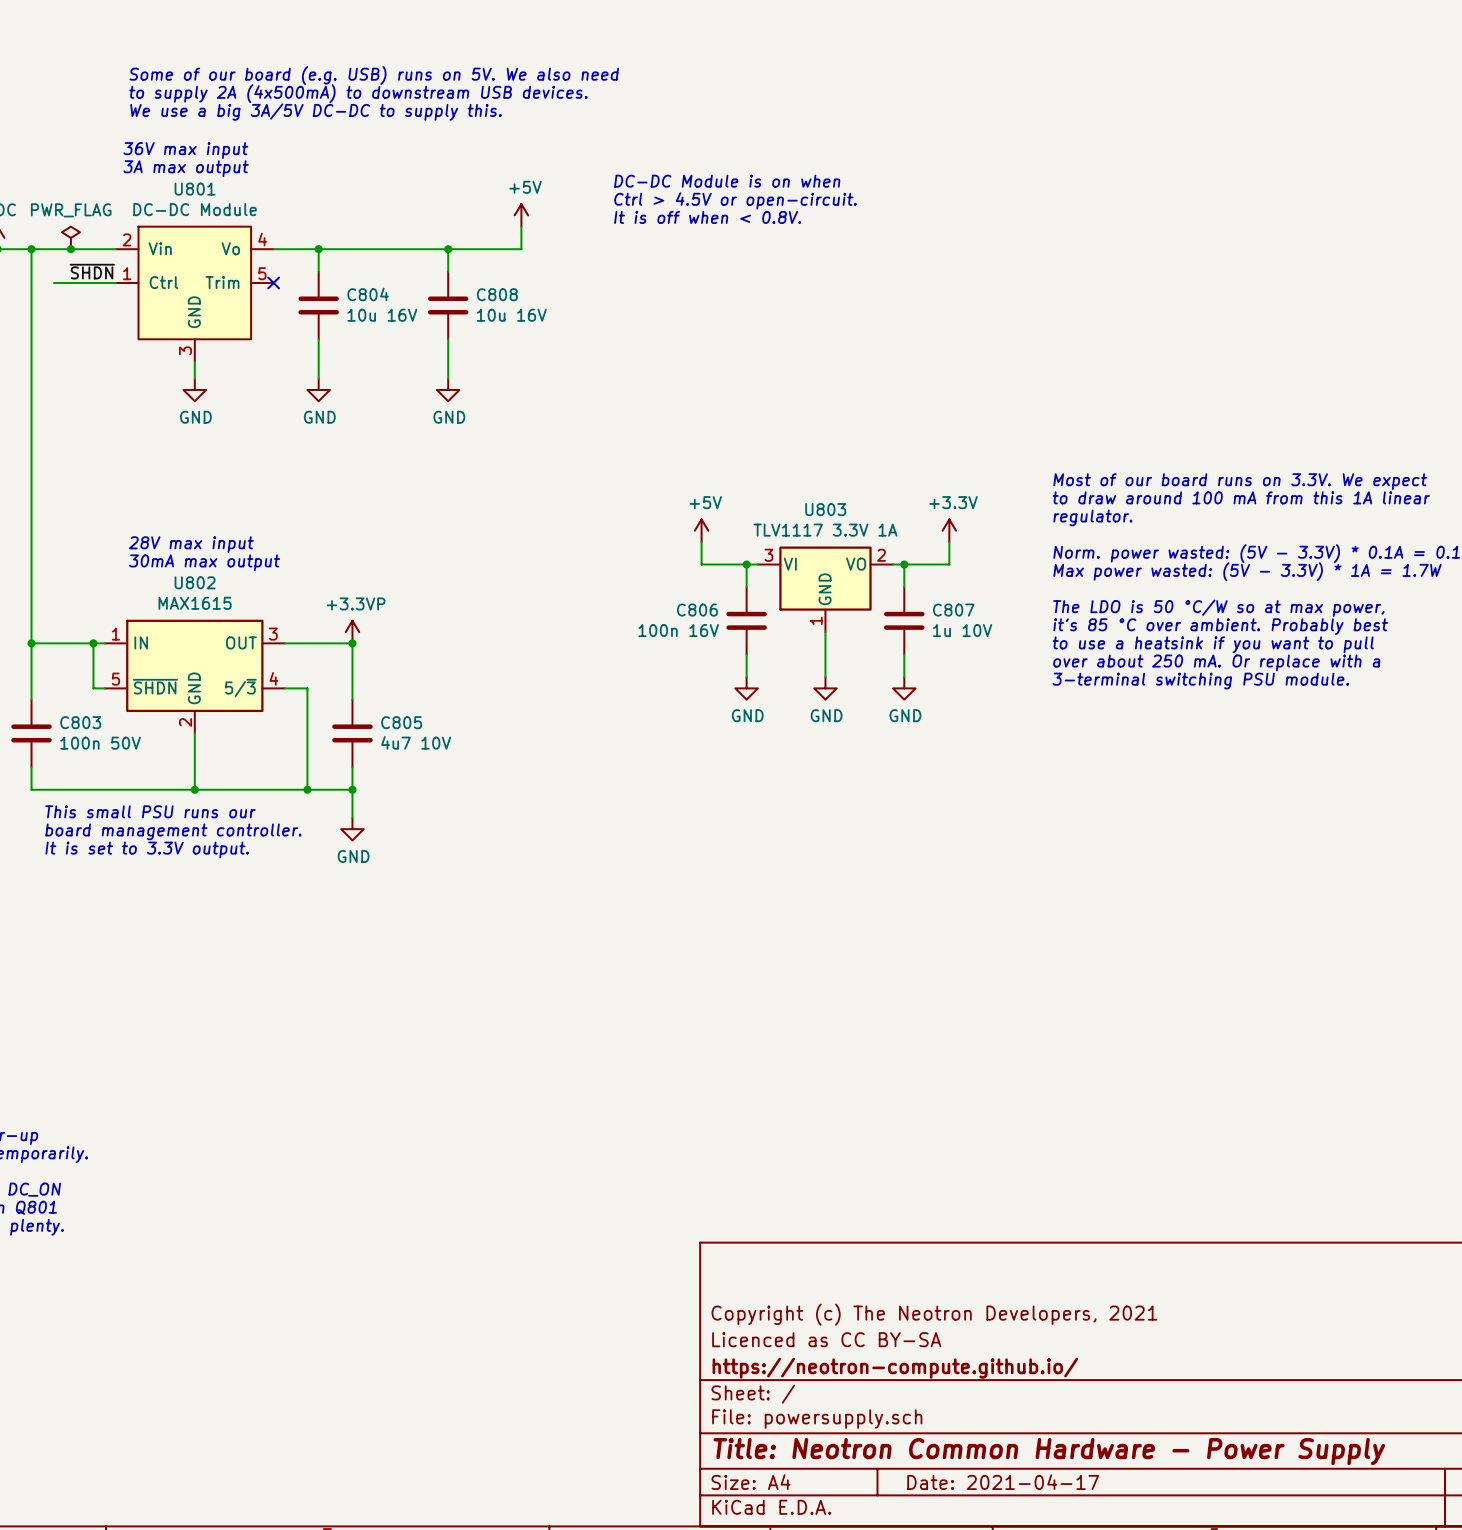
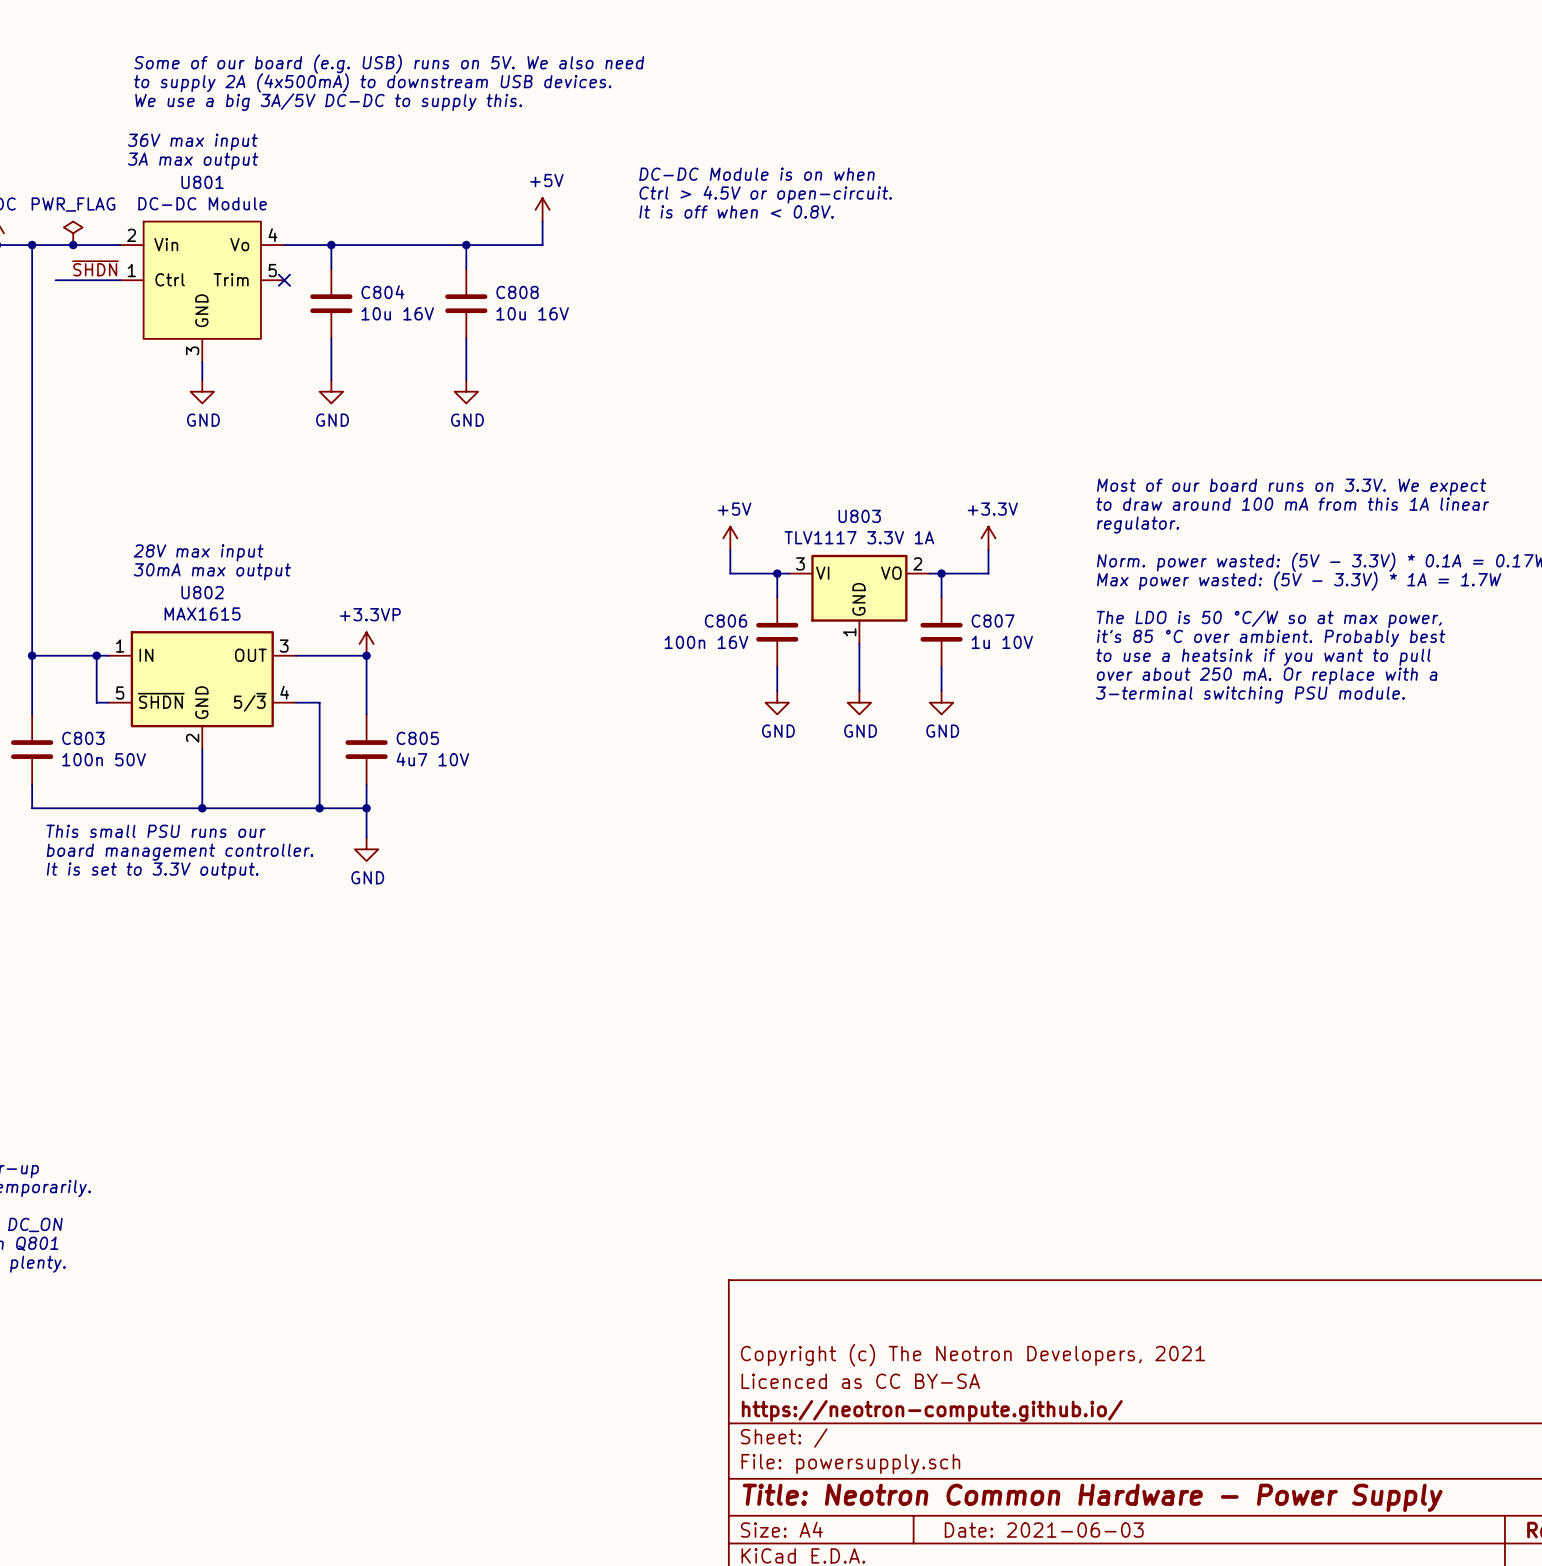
title block: Date: 2021-04-17 (1003, 1482) -> Date: 2021-06-03 (1044, 1530)

